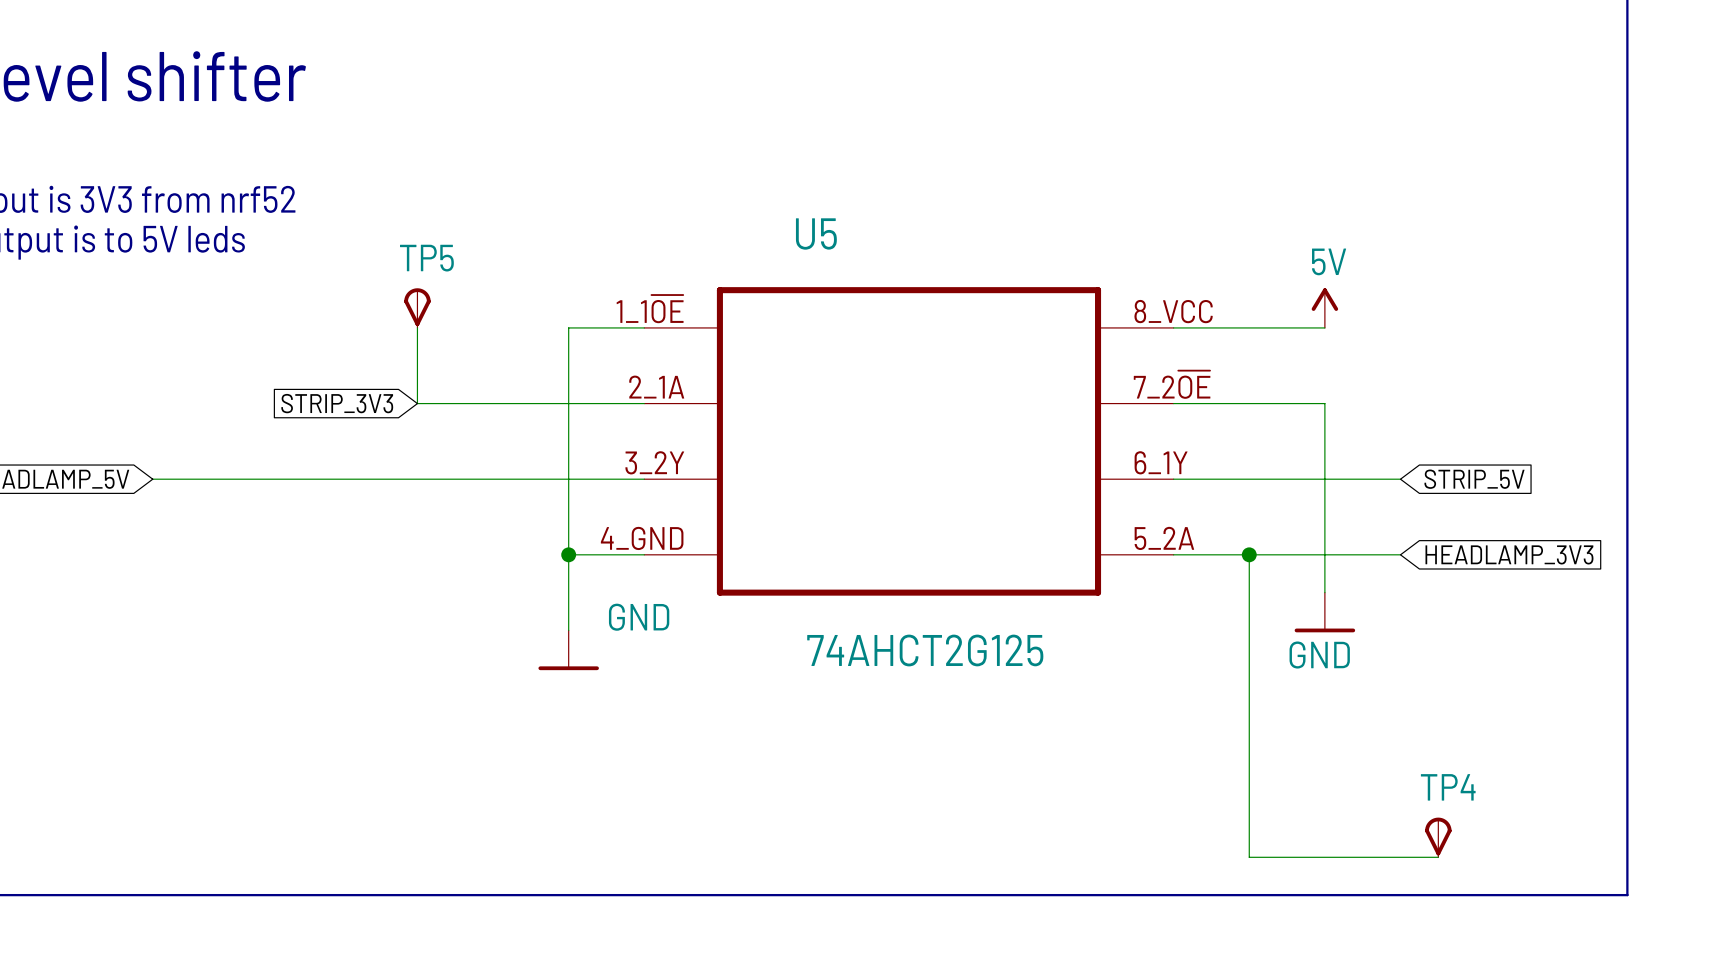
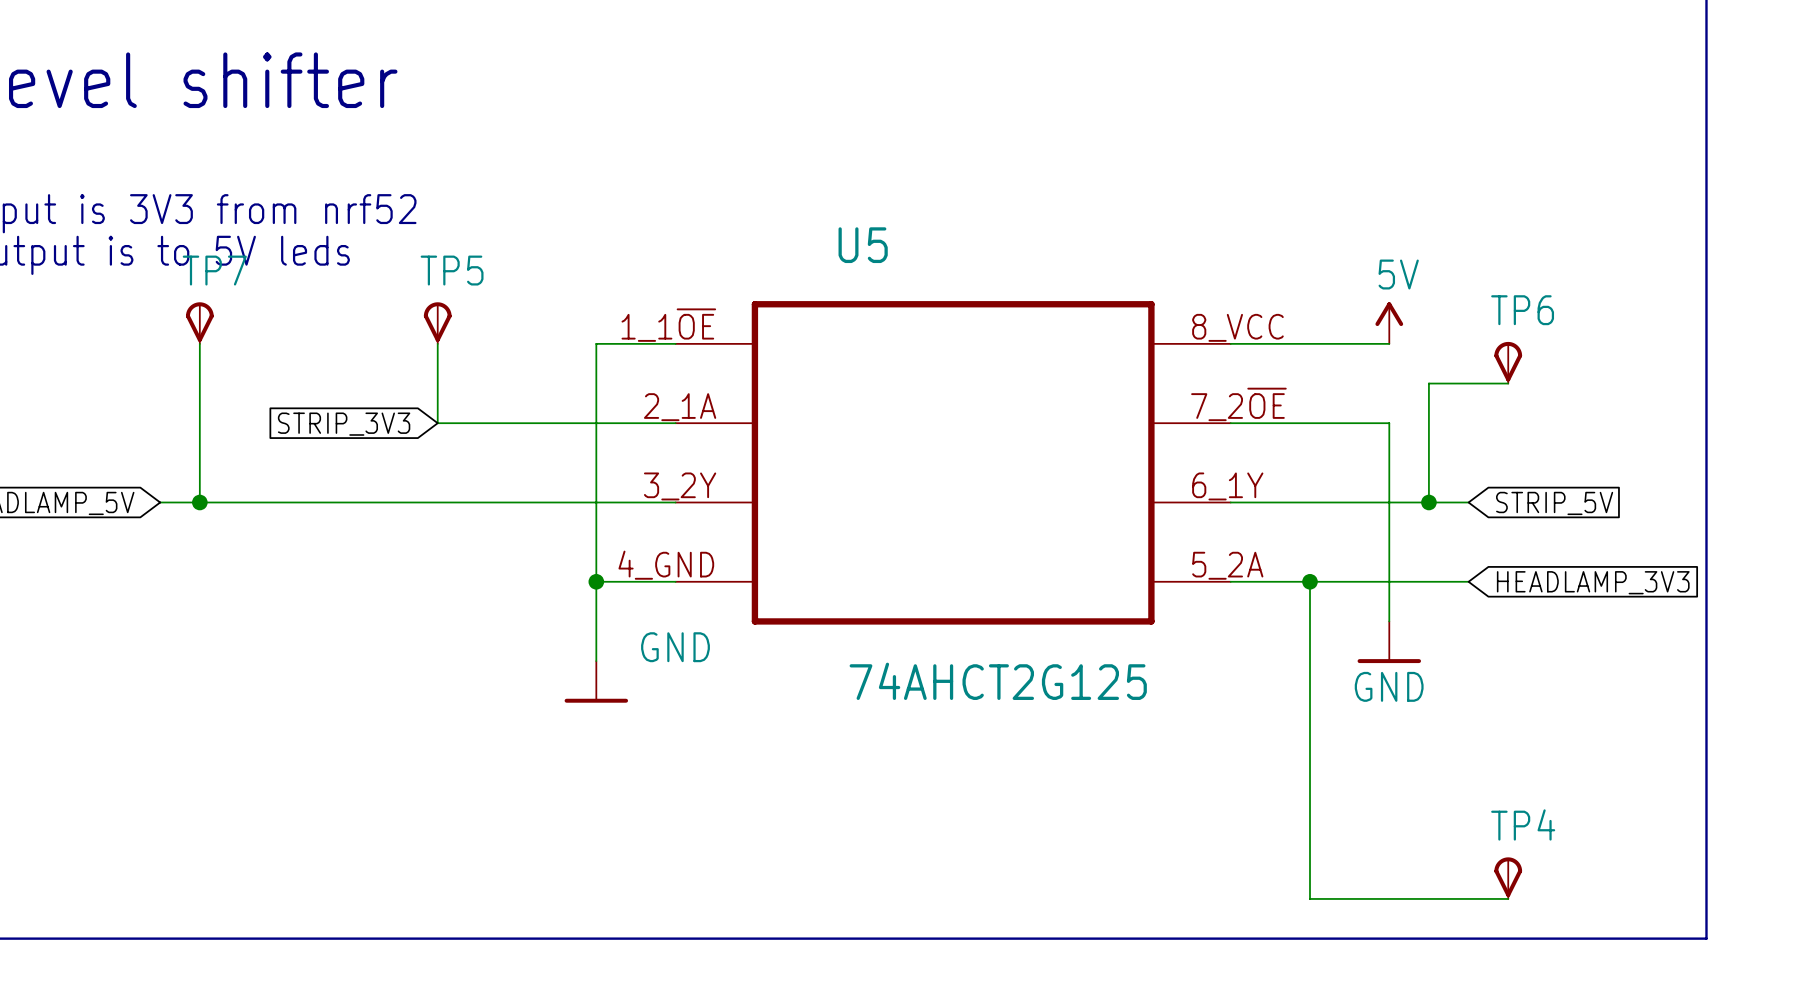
TP7: none -> (199, 323)
wire: none -> (199, 343) (199, 502)
TP6: none -> (1508, 362)
wire: none -> (1508, 383) (1428, 383) (1428, 502)
junction: none -> (199, 502)
junction: none -> (1428, 502)

